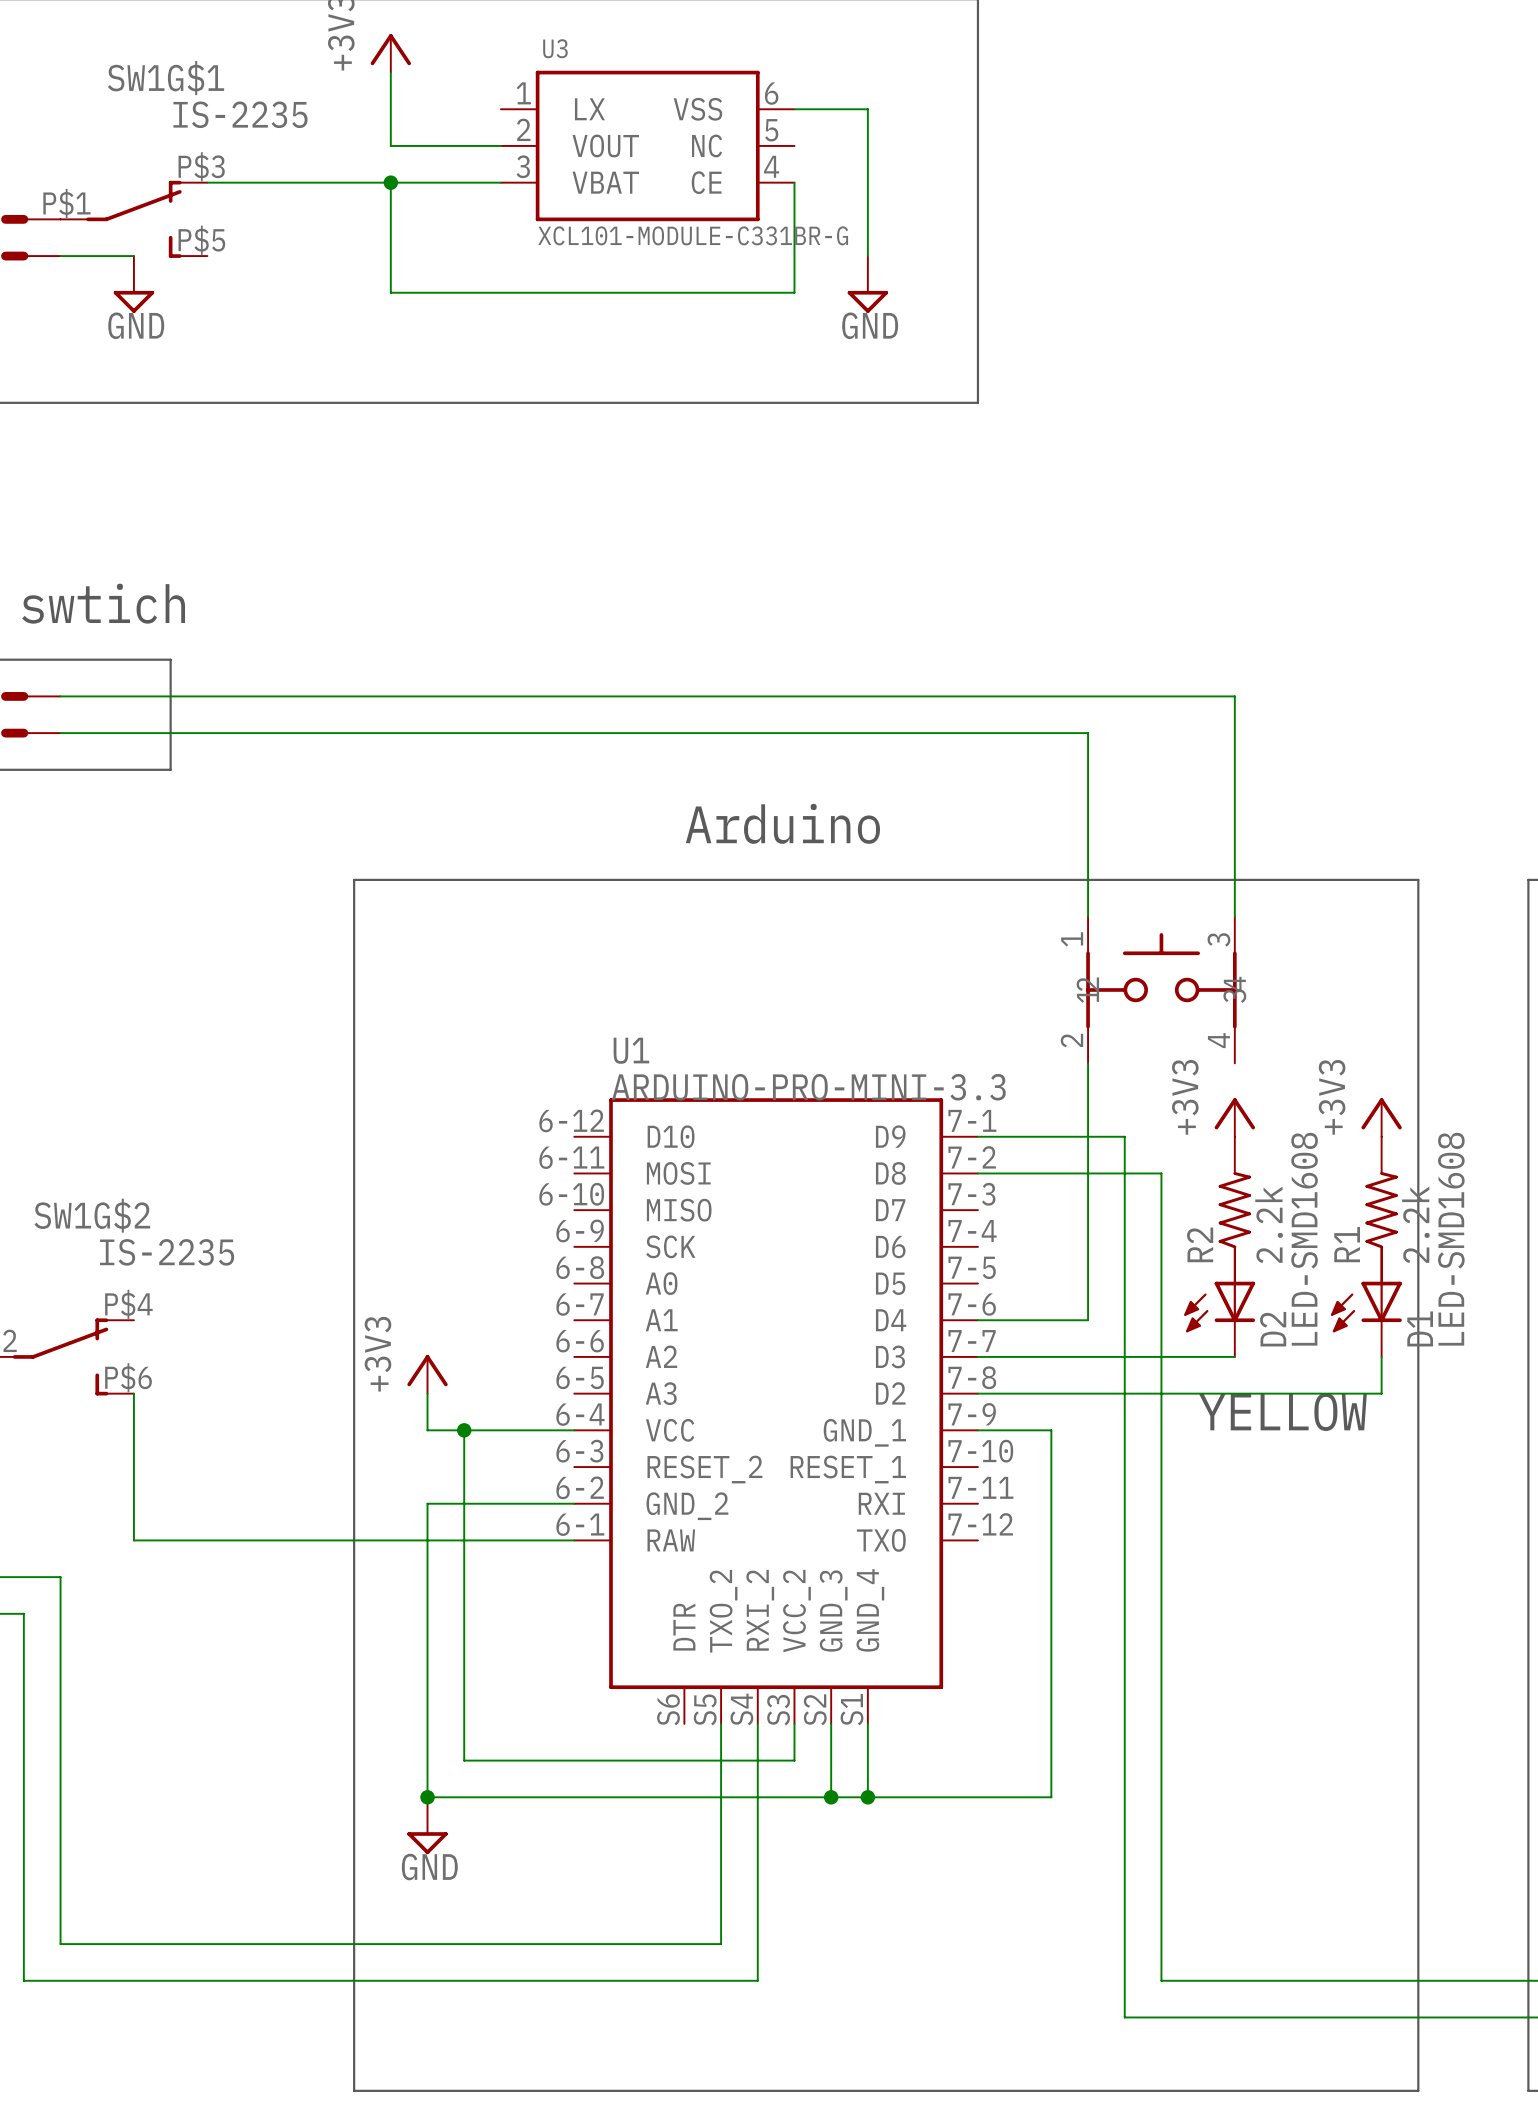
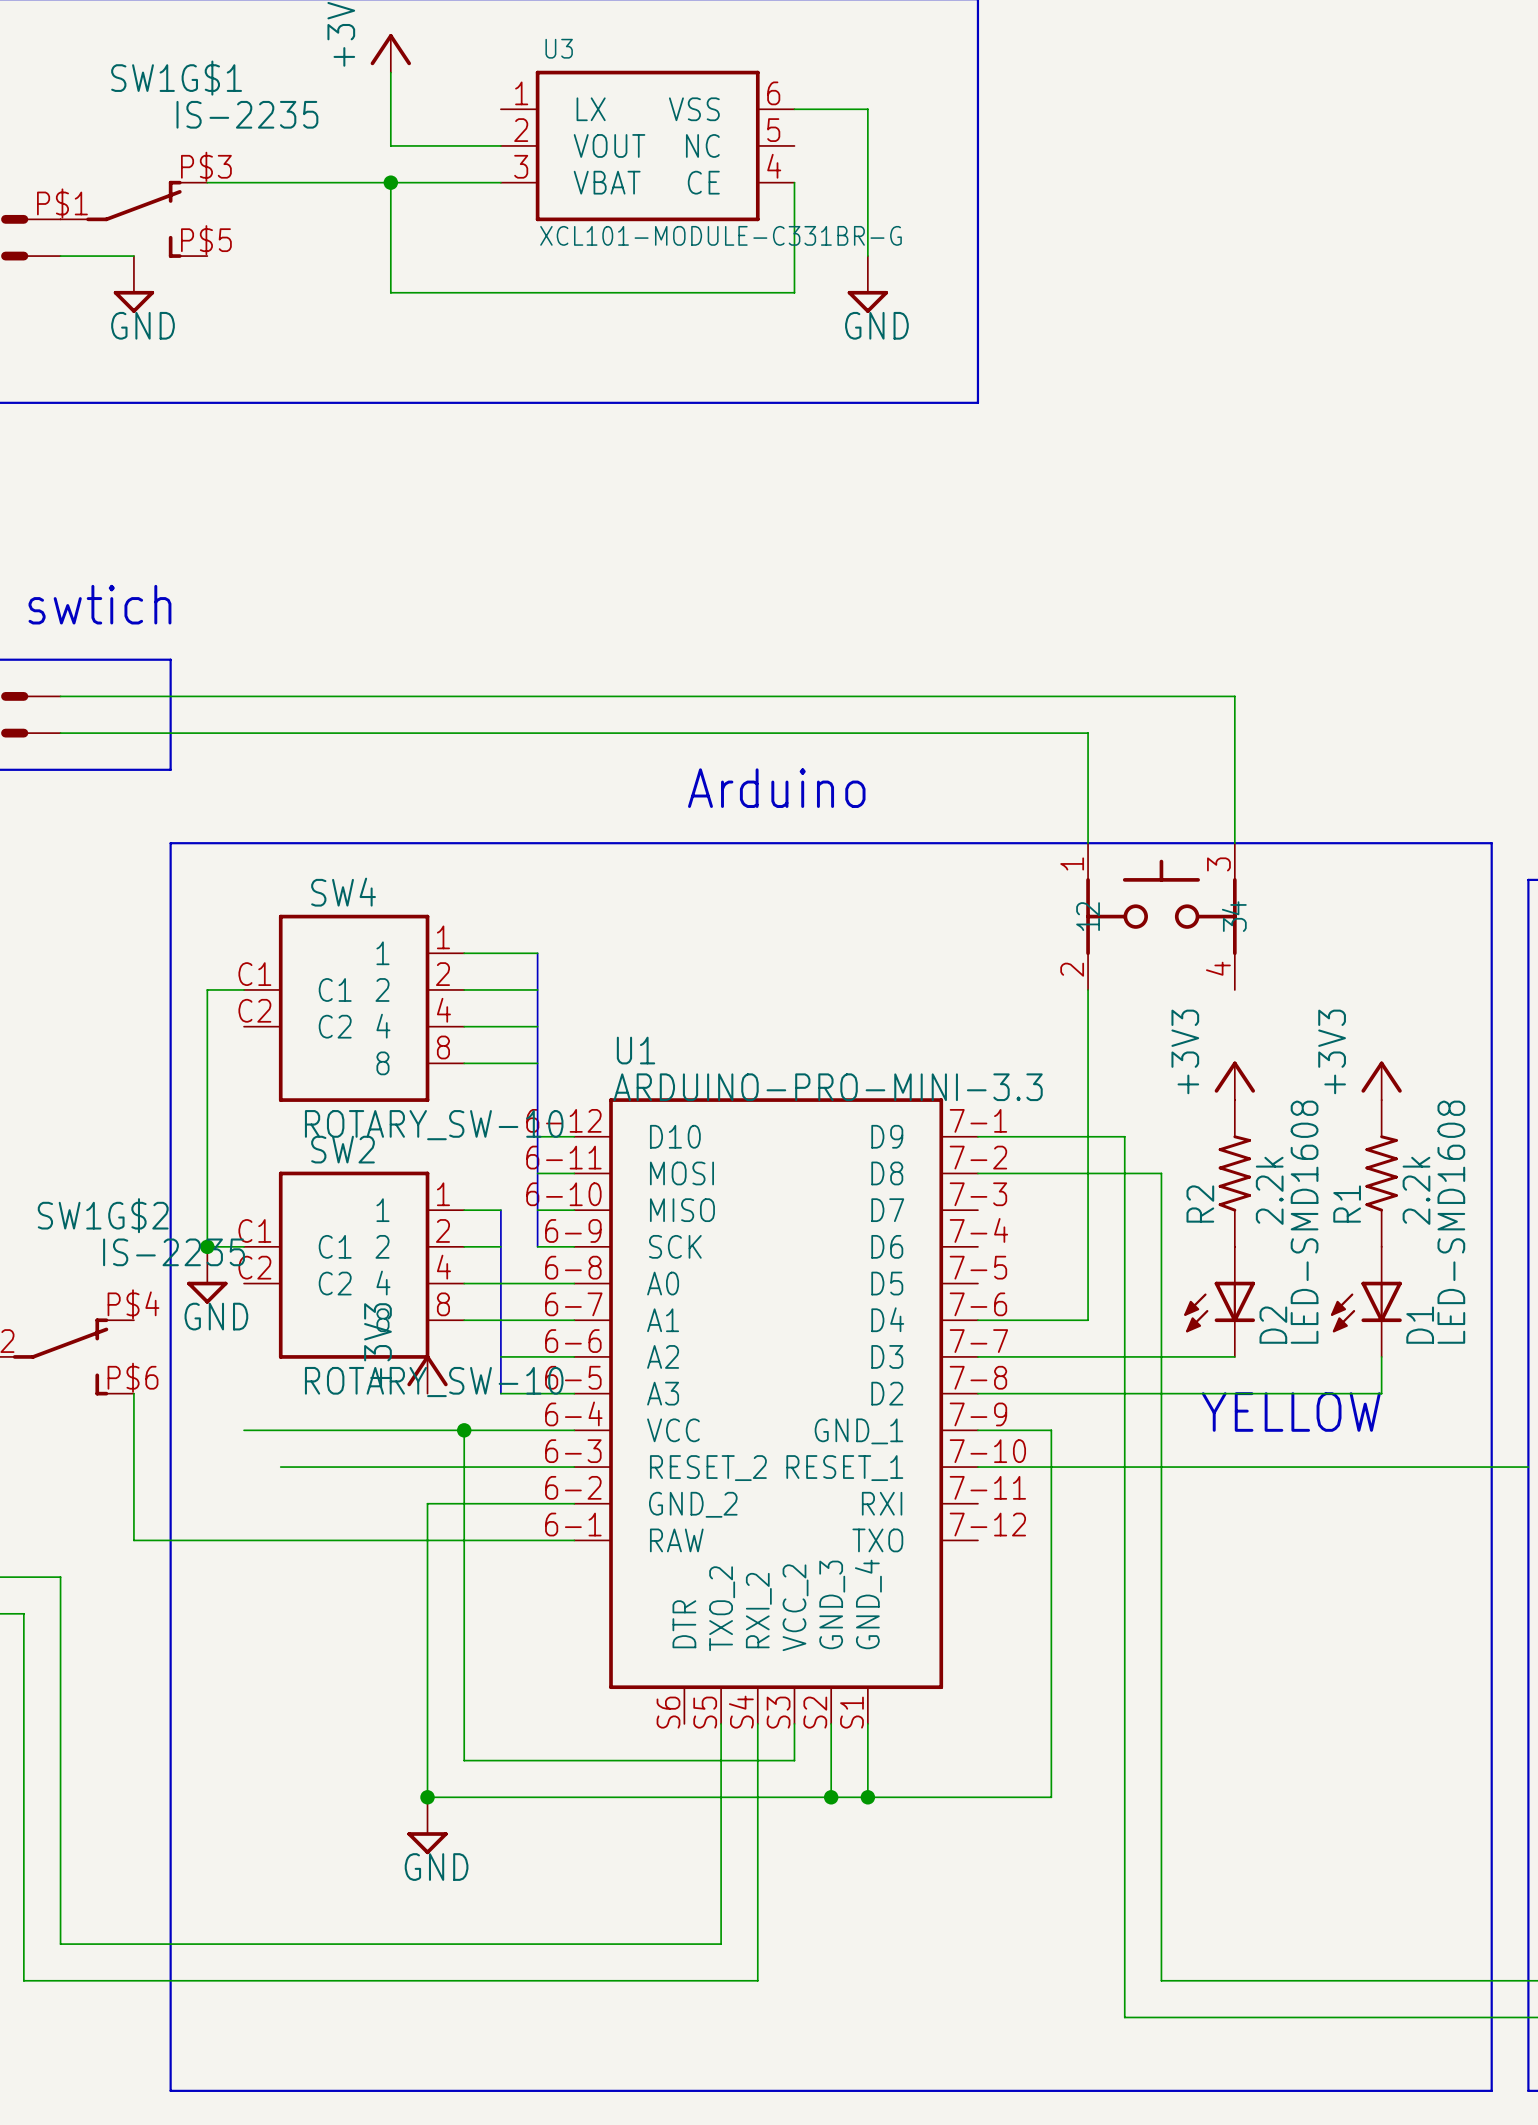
text position: Arduino (782, 823) -> Arduino (776, 788)
wire: none -> (464, 953) (537, 953)
bus: none -> (537, 953) (537, 1246)
wire: none -> (244, 989) (207, 989) (207, 1246) (244, 1246)
wire: none -> (464, 989) (537, 989)
part position: (1161, 989) -> (1161, 916)
SW4: none -> ROTARY_SW-10 (354, 1008)
wire: none -> (464, 1026) (537, 1026)
wire: none -> (464, 1063) (537, 1063)
power symbol position: +3V3 (1234, 1117) -> +3V3 (1234, 1080)
power symbol position: +3V3 (1381, 1117) -> +3V3 (1381, 1080)
wire: none -> (537, 1136) (574, 1136)
wire: none -> (537, 1173) (574, 1173)
wire: none -> (464, 1210) (500, 1210)
bus: none -> (500, 1210) (500, 1393)
wire: none -> (537, 1210) (574, 1210)
R2 position: (1234, 1210) -> (1234, 1173)
R1 position: (1381, 1210) -> (1381, 1173)
junction: none -> (207, 1246)
wire: none -> (464, 1246) (500, 1246)
wire: none -> (537, 1246) (574, 1246)
SW2: none -> ROTARY_SW-10 (354, 1265)
power symbol: none -> GND (207, 1275)
wire: none -> (464, 1283) (574, 1283)
wire: none -> (464, 1320) (574, 1320)
wire: none -> (500, 1356) (574, 1356)
wire: (427, 1393) (427, 1430) -> (244, 1430) (427, 1430)
wire: none -> (500, 1393) (574, 1393)
wire: none -> (280, 1467) (574, 1467)
wire: none -> (977, 1467) (1528, 1467)
line: (354, 2090) (354, 879) (1418, 879) (1418, 2090) -> (354, 2090) (170, 2090) (170, 843) (1491, 843) (1491, 2090) (1418, 2090)

